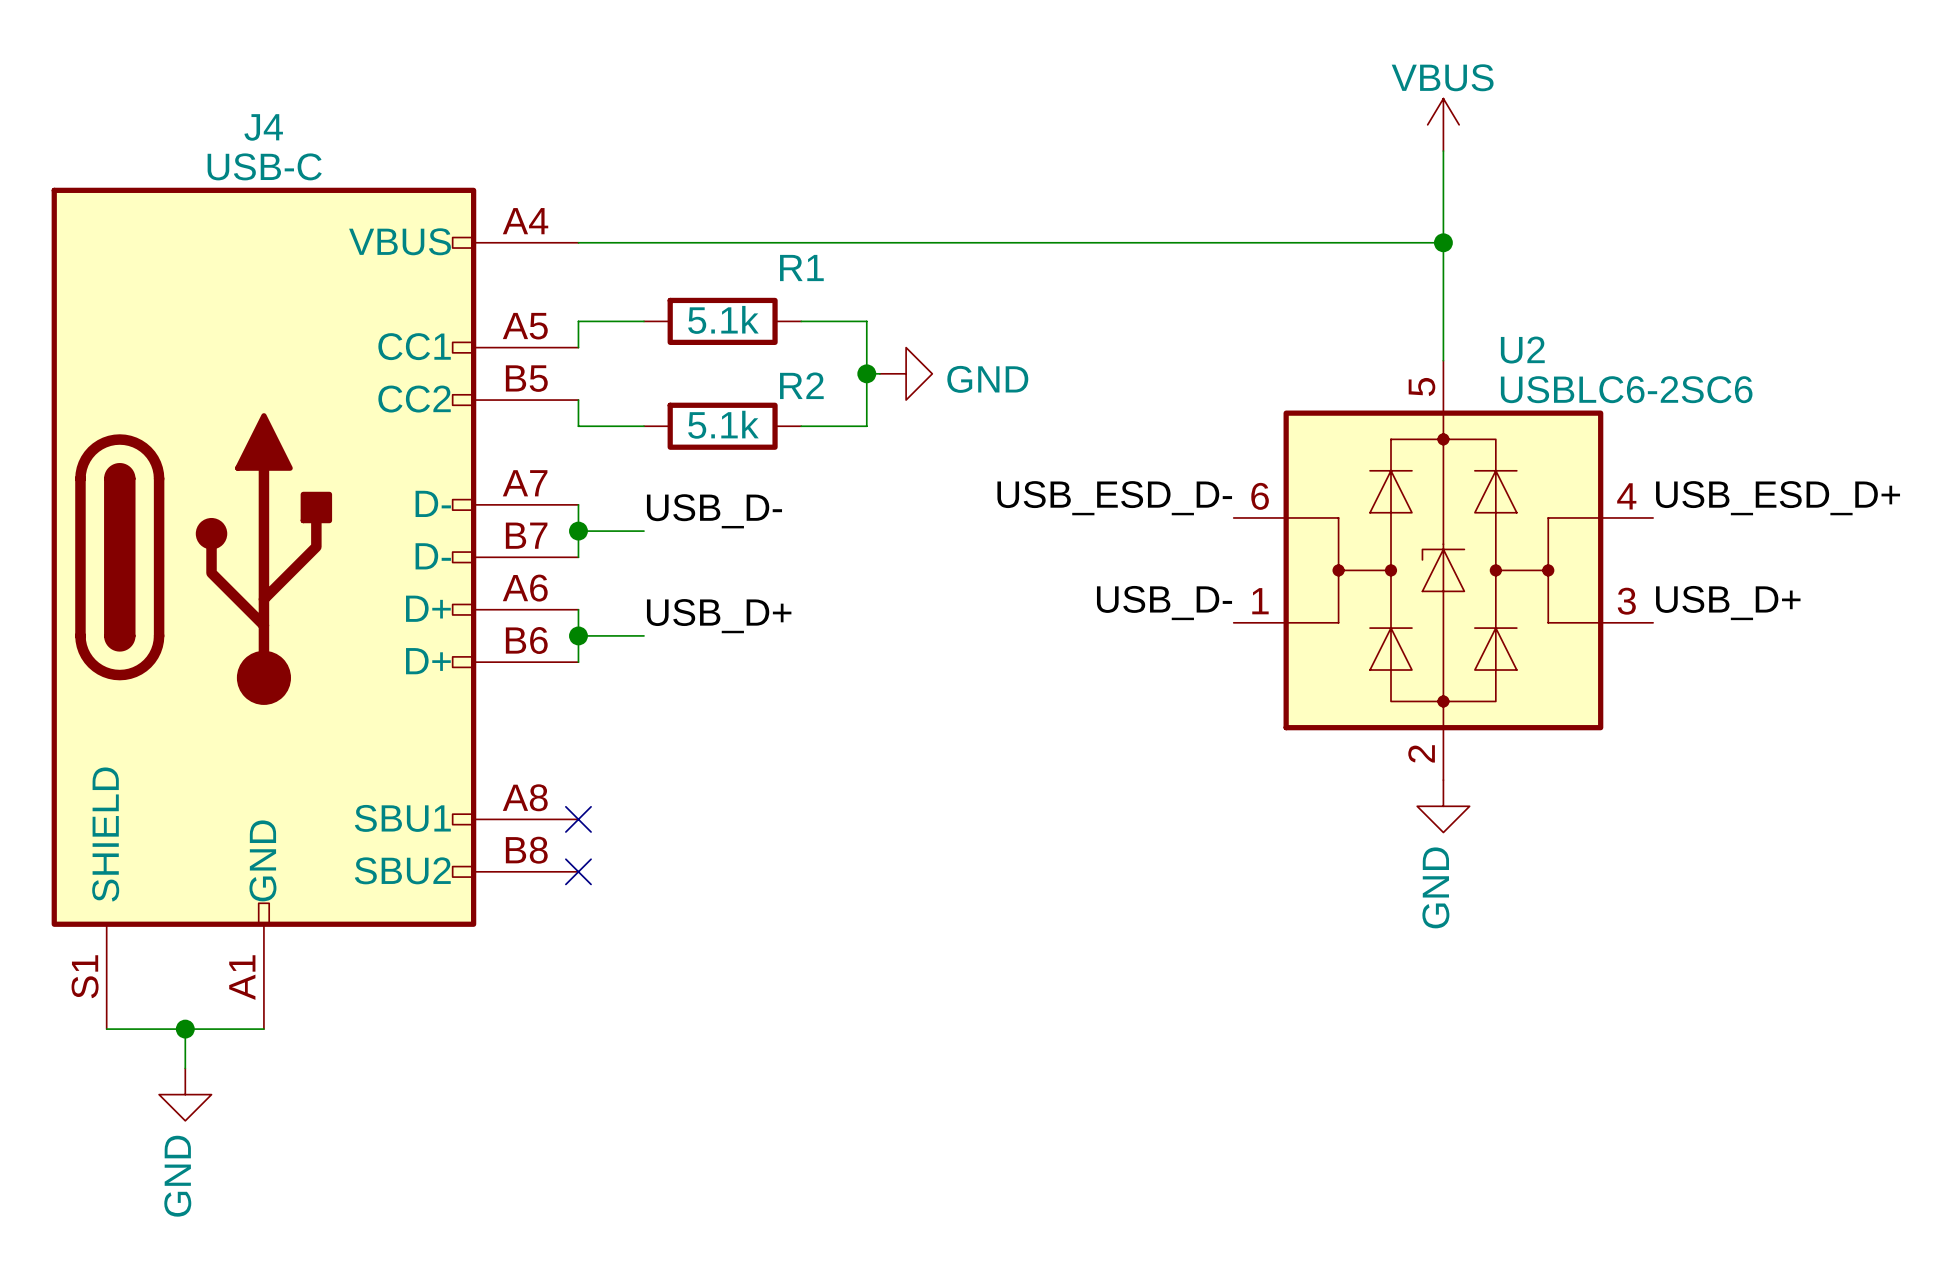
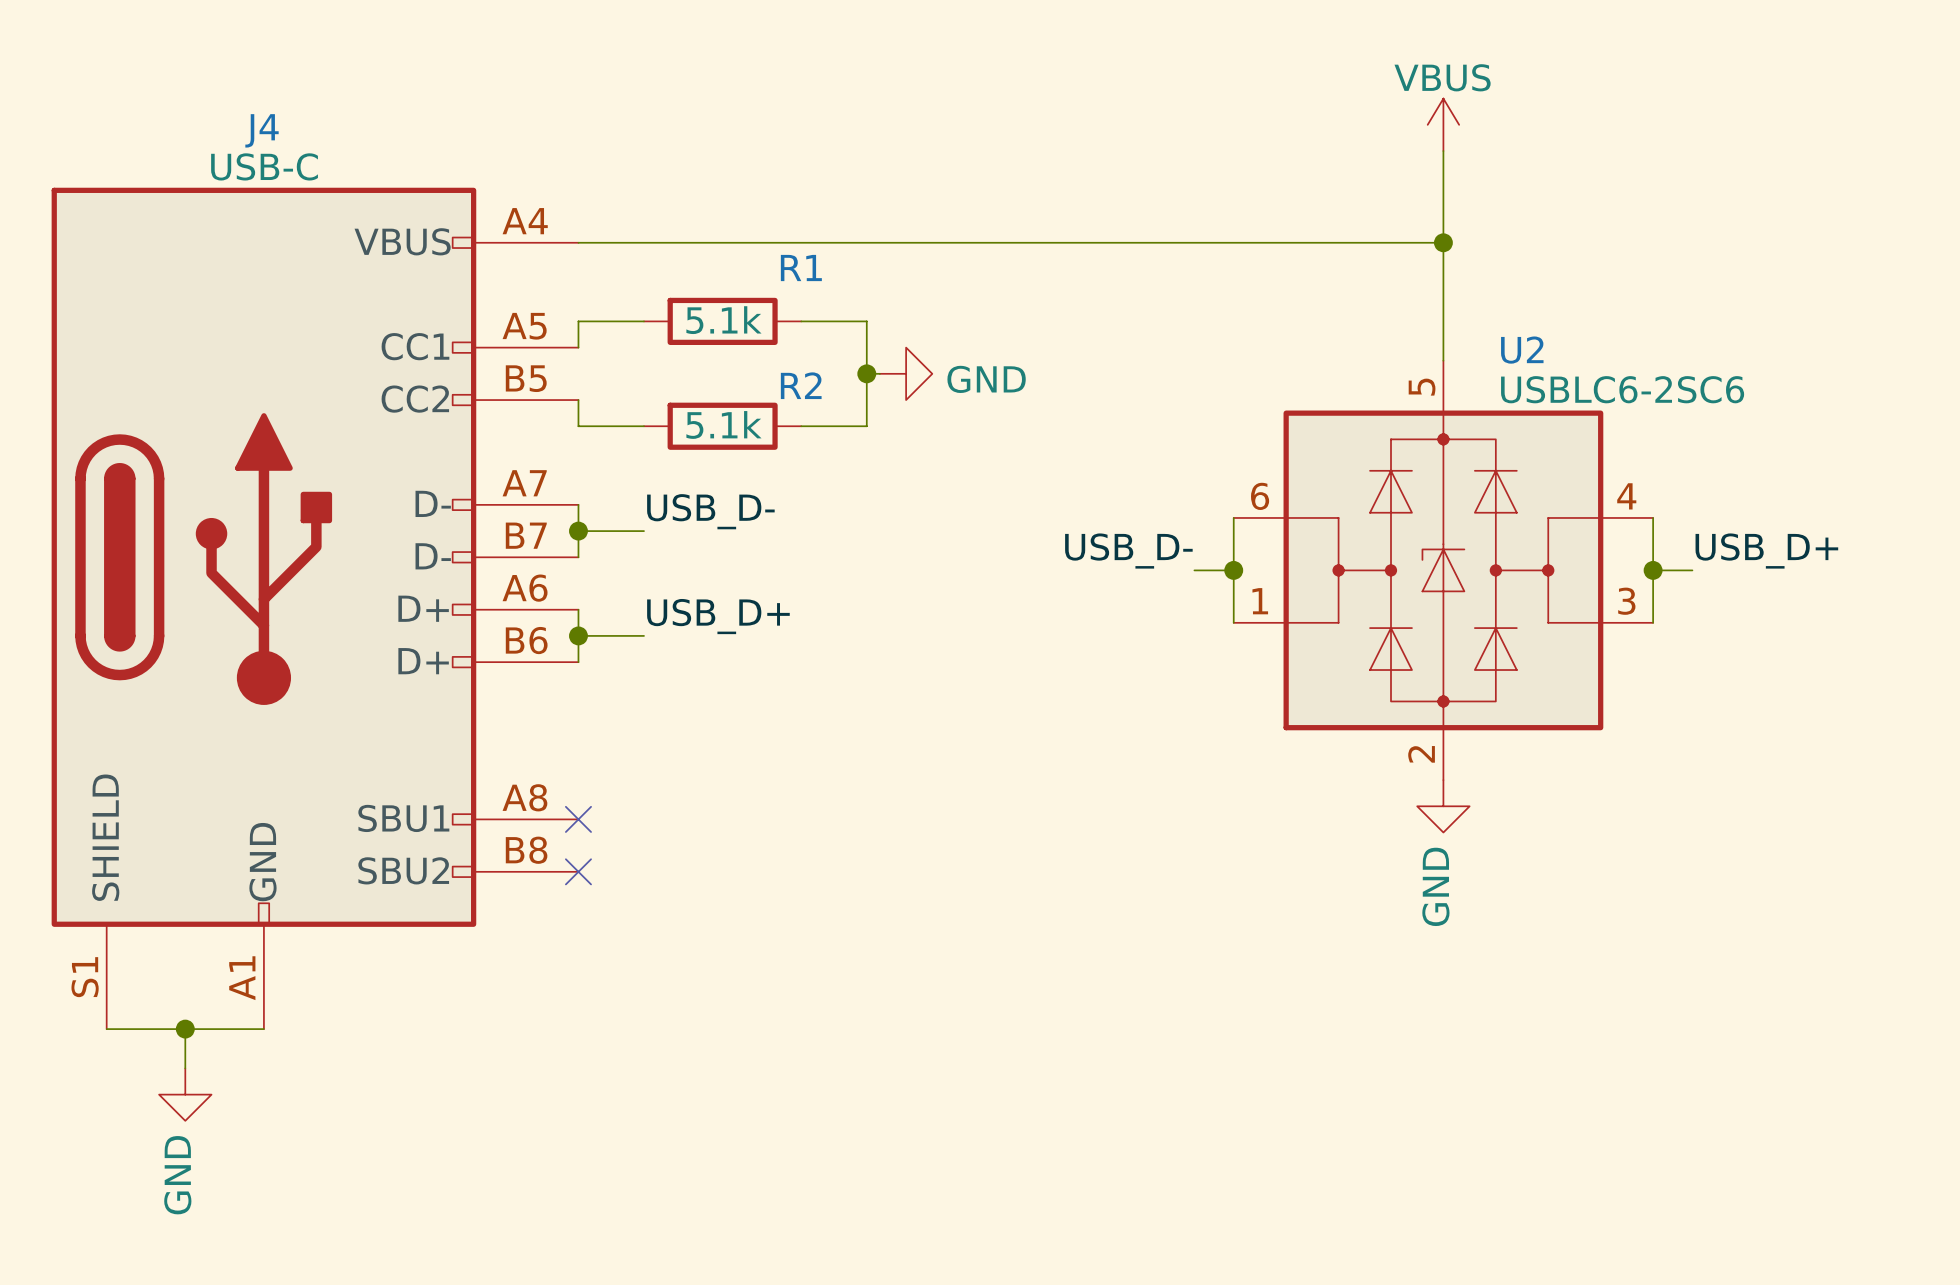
label: USB_ESD_D- (1114, 498) -> none
label: USB_ESD_D+ (1778, 498) -> none
wire: none -> (1233, 517) (1233, 622)
wire: none -> (1653, 517) (1653, 622)
wire: none -> (1194, 570) (1233, 570)
junction: none -> (1233, 570)
wire: none -> (1653, 570) (1692, 570)
junction: none -> (1653, 570)
label position: USB_D- (1164, 603) -> USB_D- (1128, 551)
label position: USB_D+ (1728, 603) -> USB_D+ (1766, 551)

